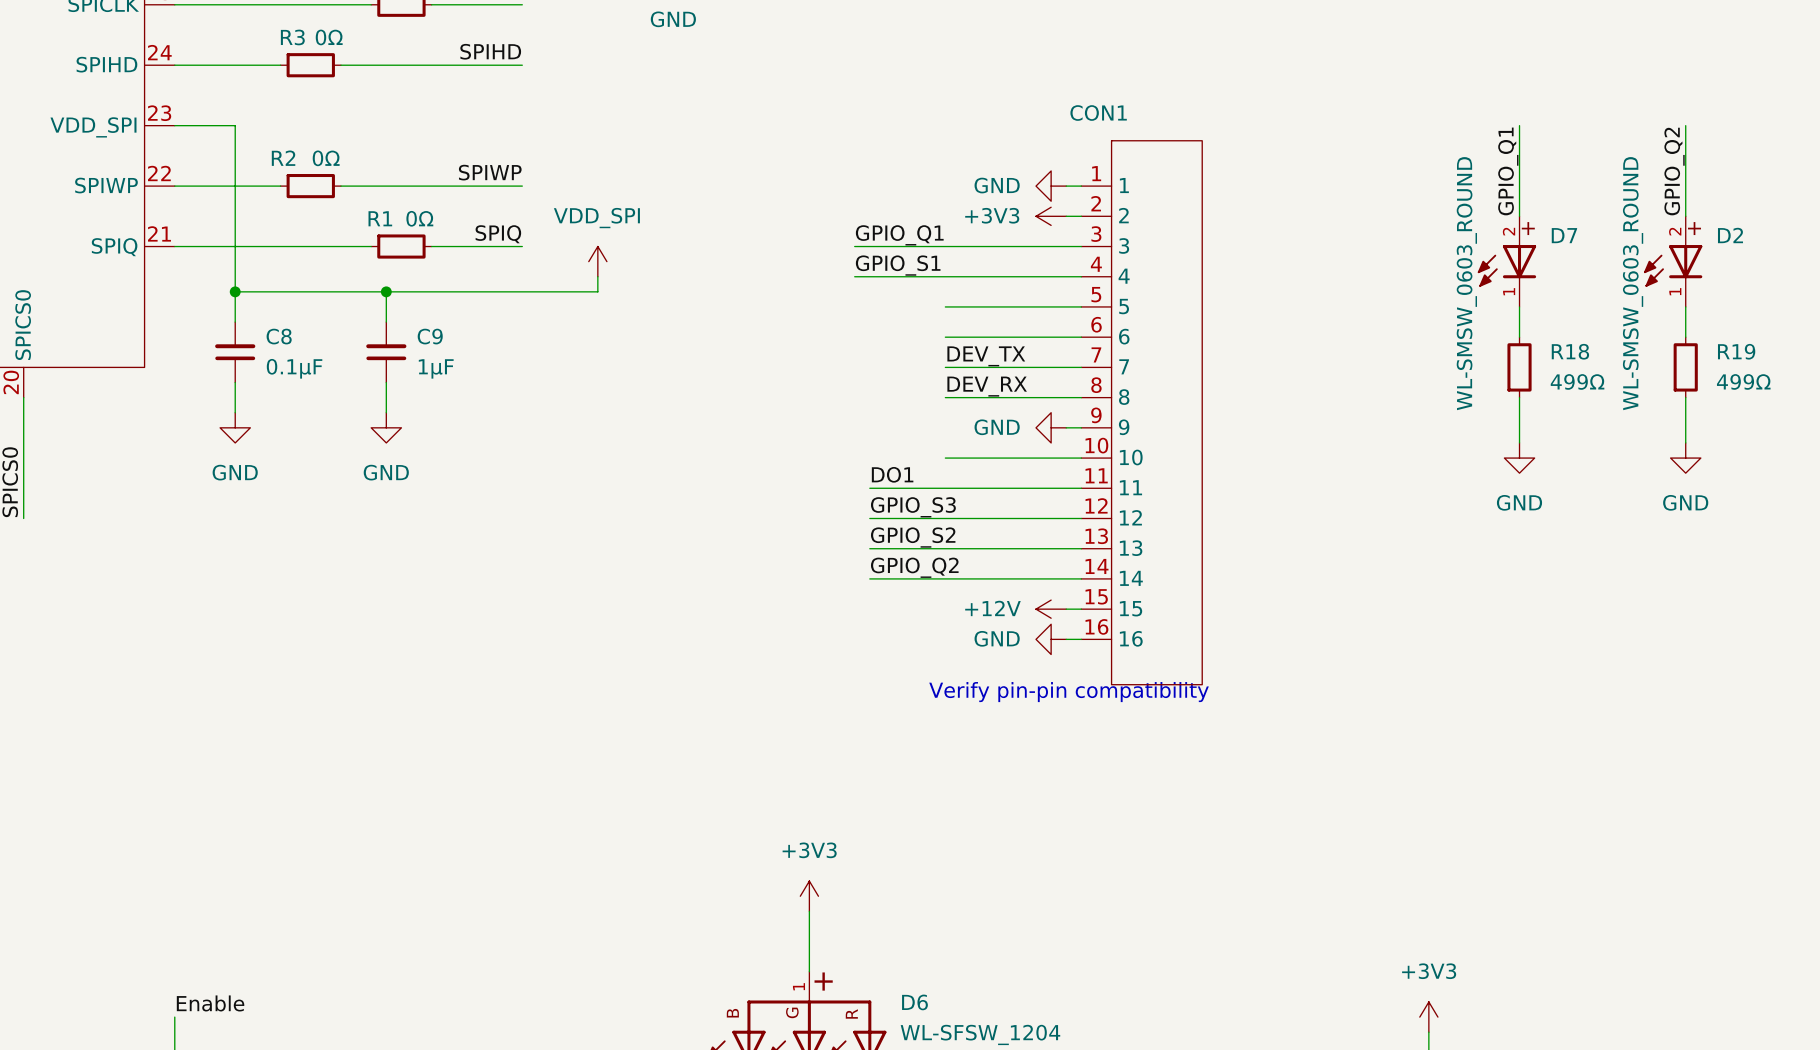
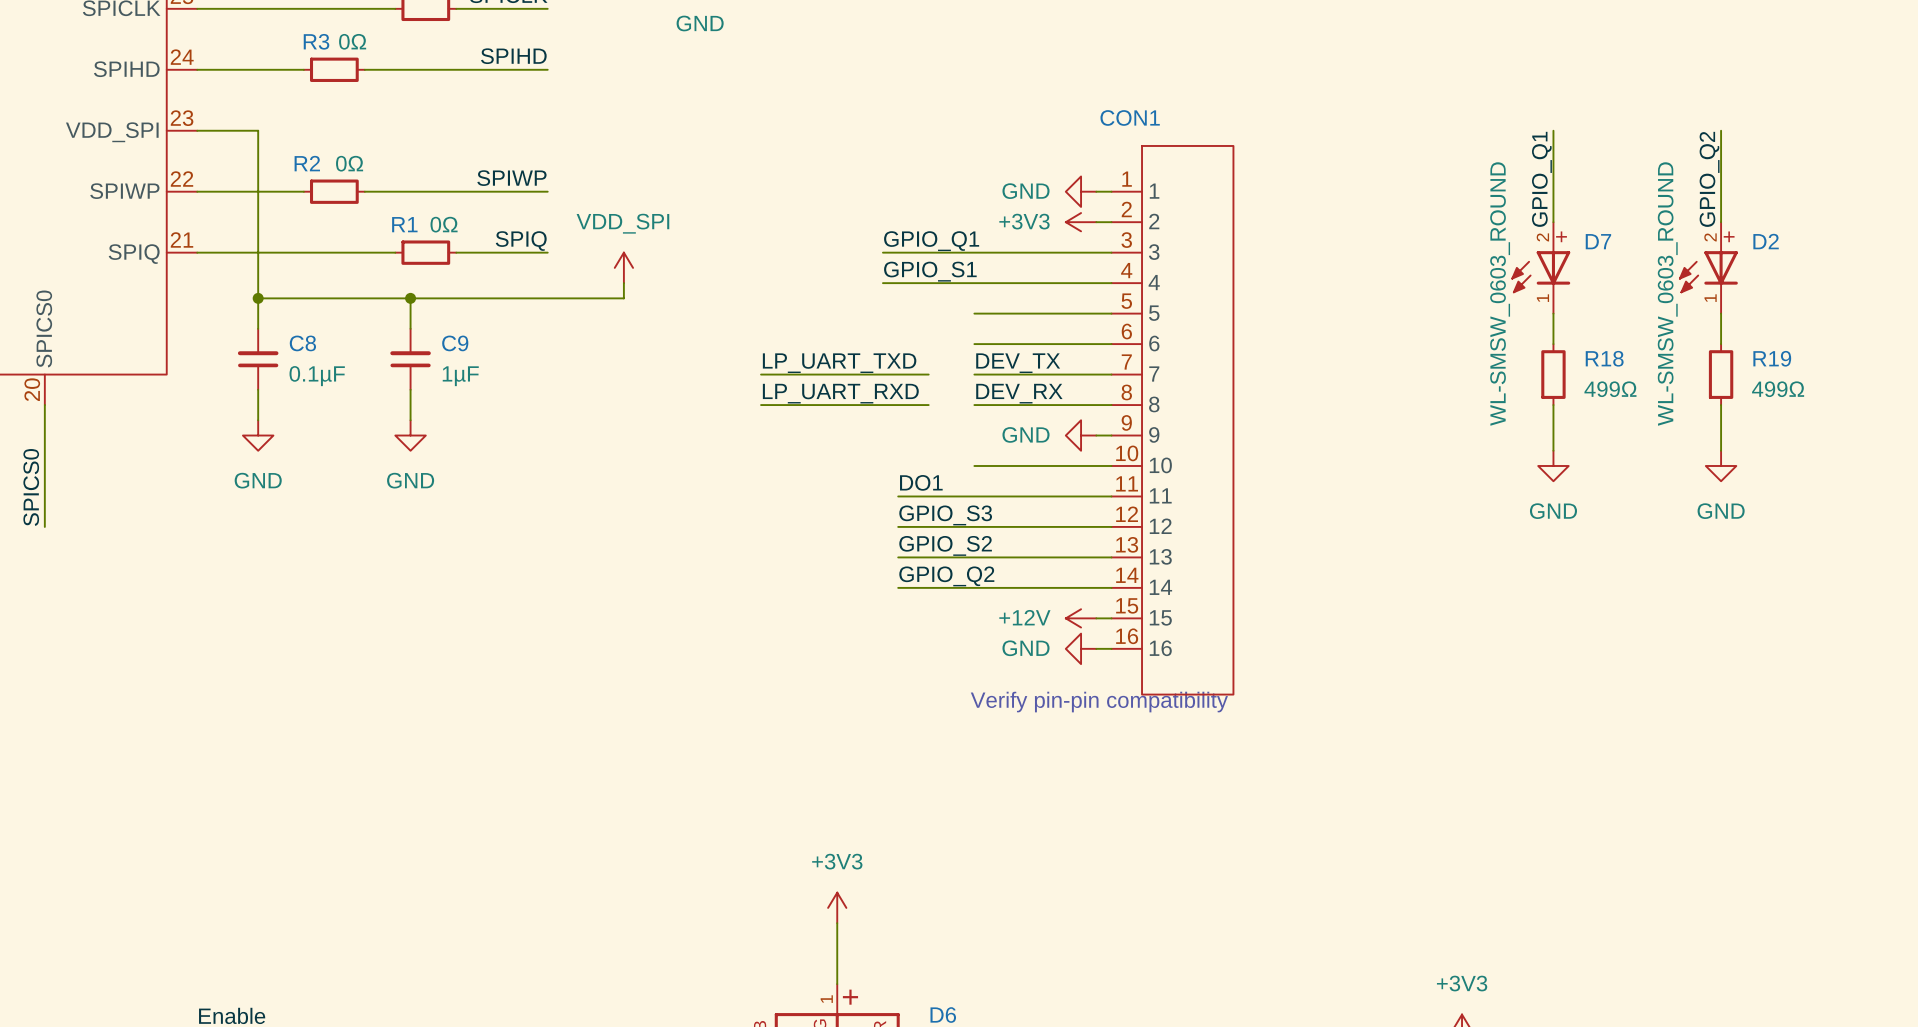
label: none -> LP_UART_TXD (839, 363)
wire: none -> (761, 374) (928, 374)
label: none -> LP_UART_RXD (840, 393)
wire: none -> (761, 405) (928, 405)

